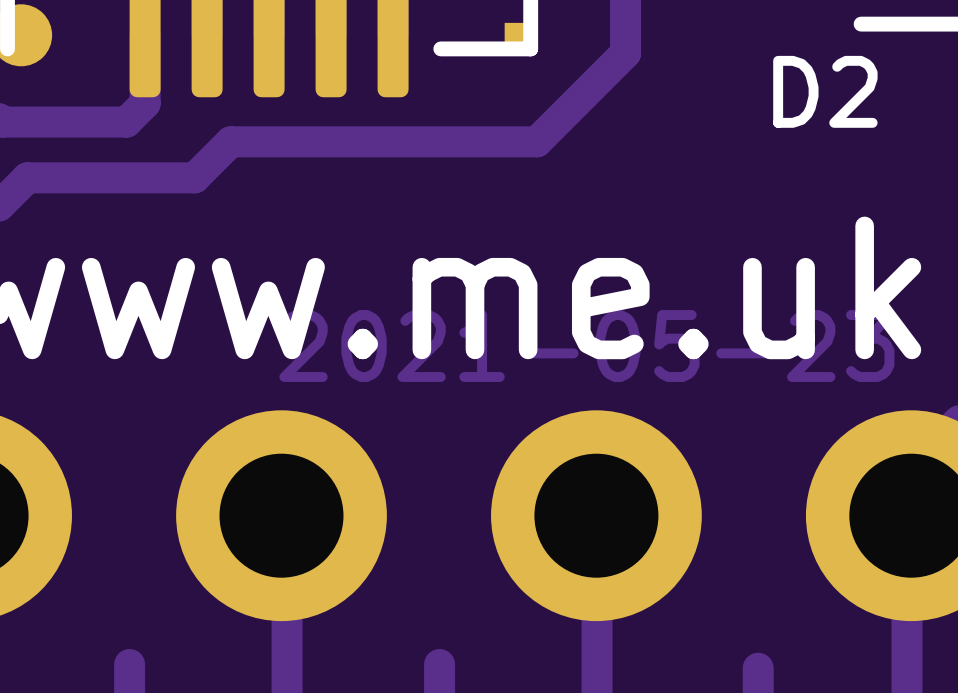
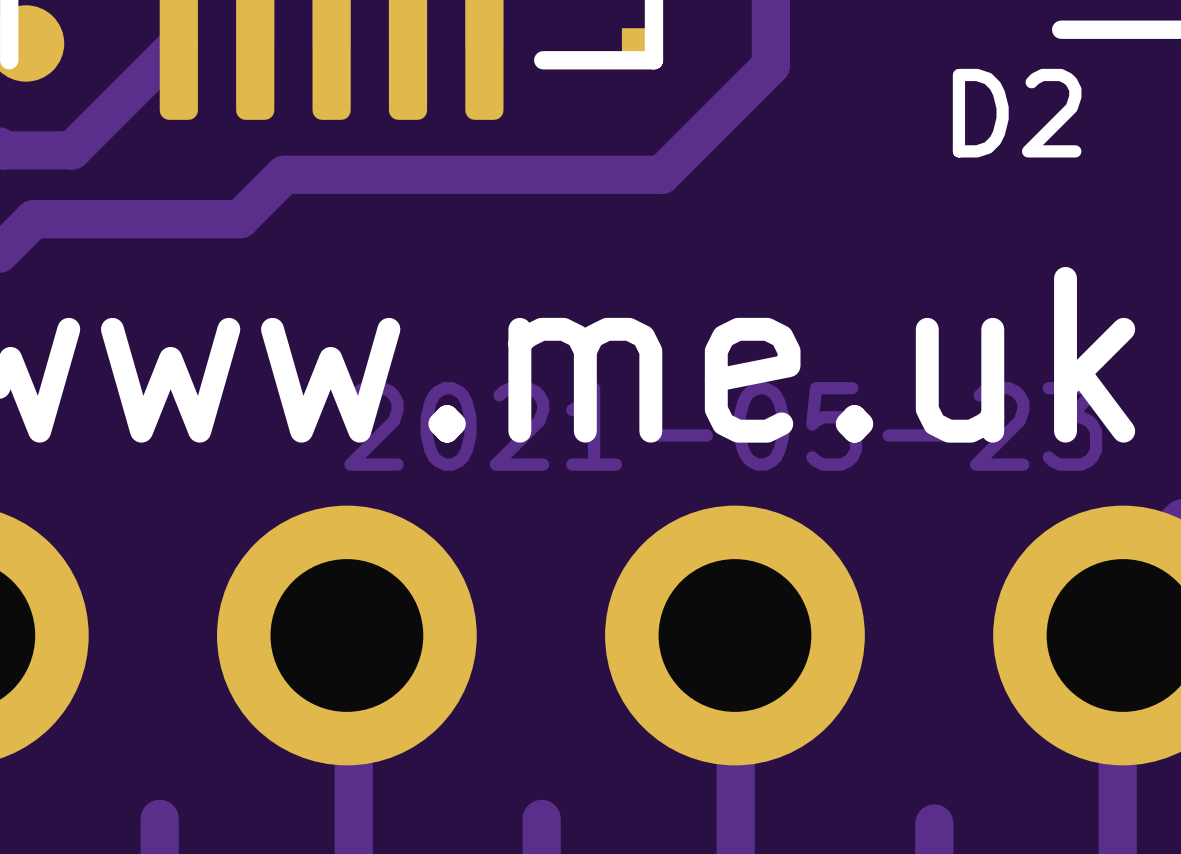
track: (145, 35) (145, 103) (126, 122) (58, 122) -> (178, 43) (71, 150)

